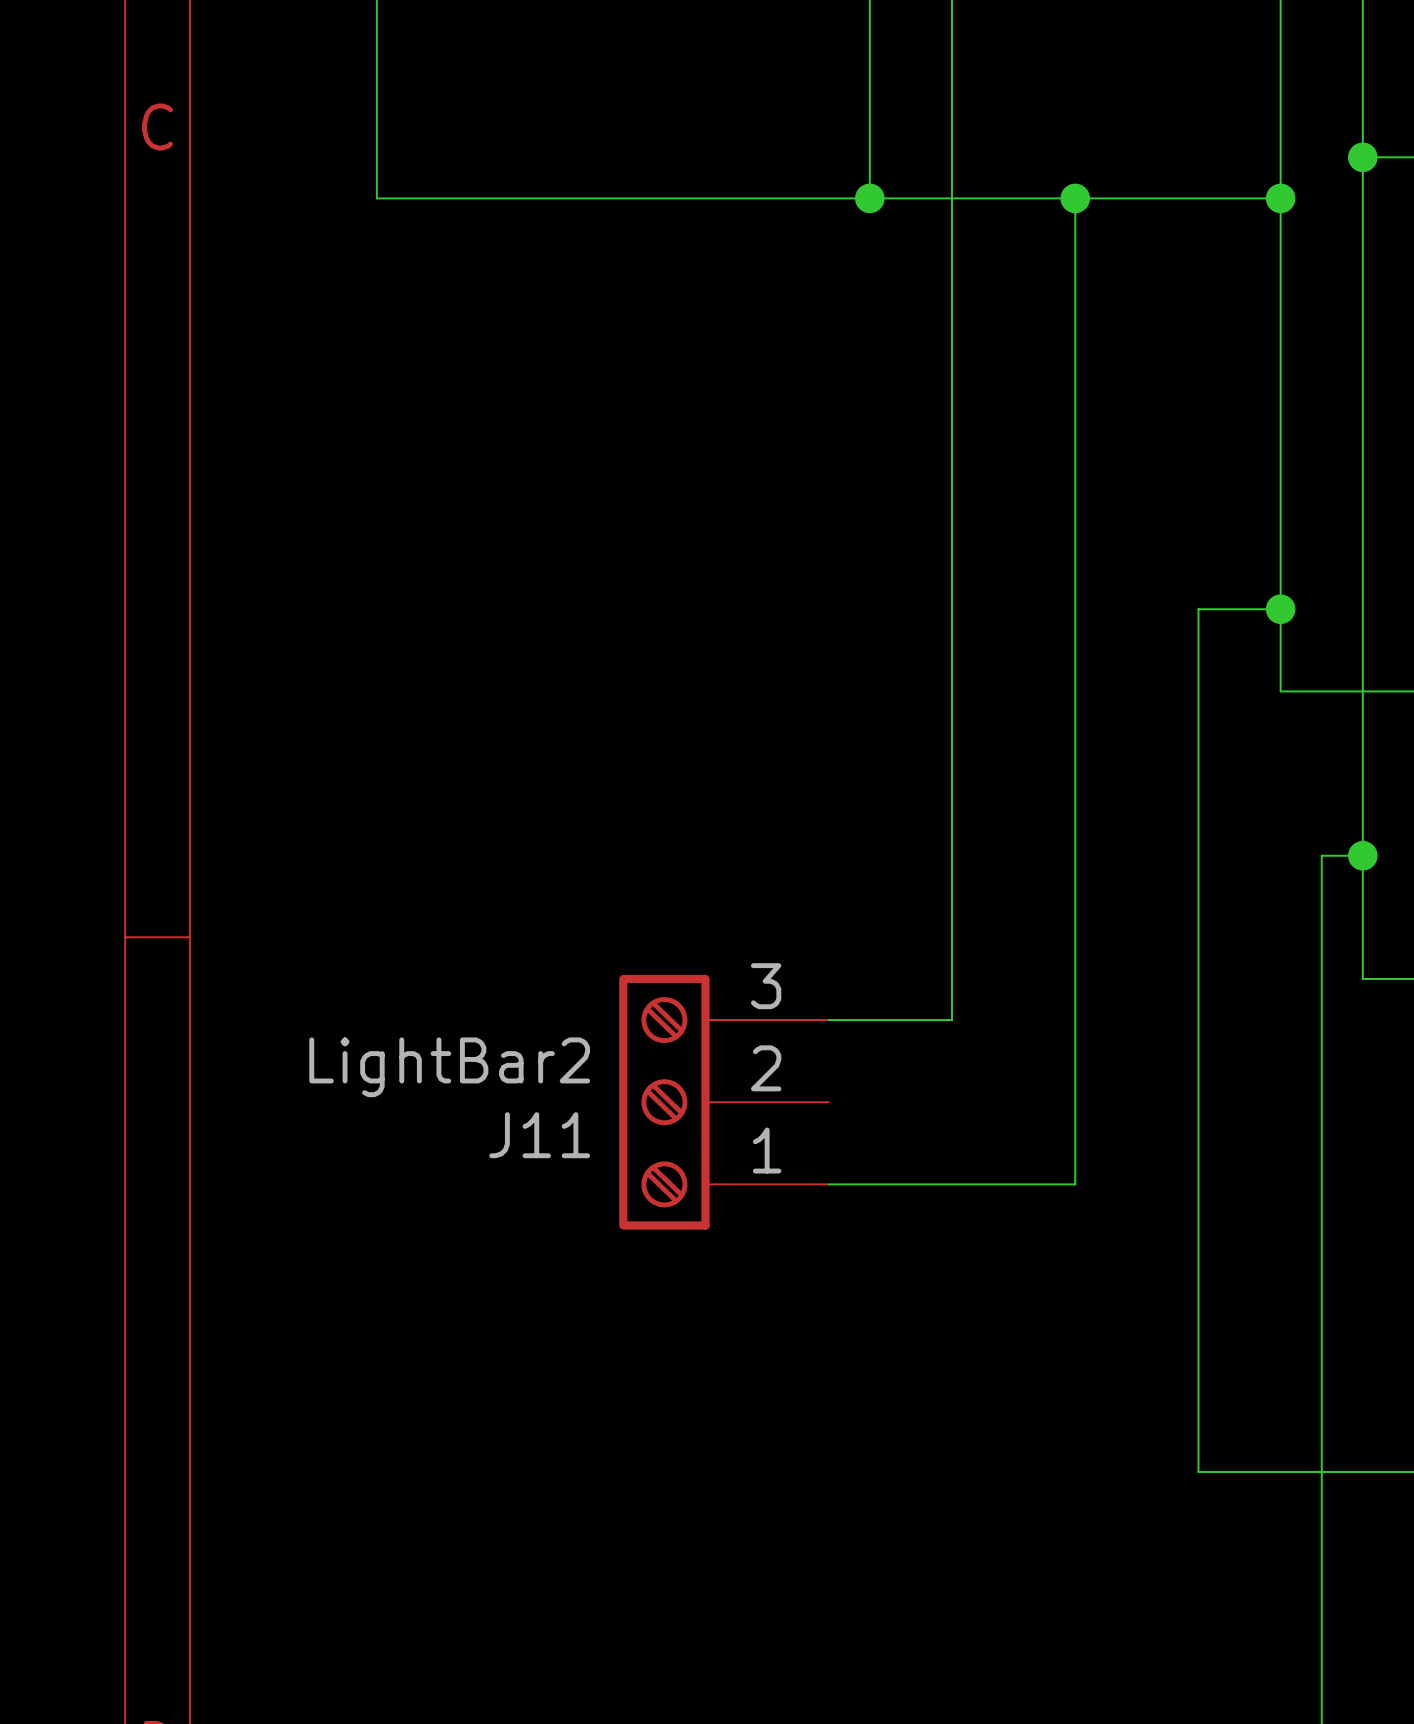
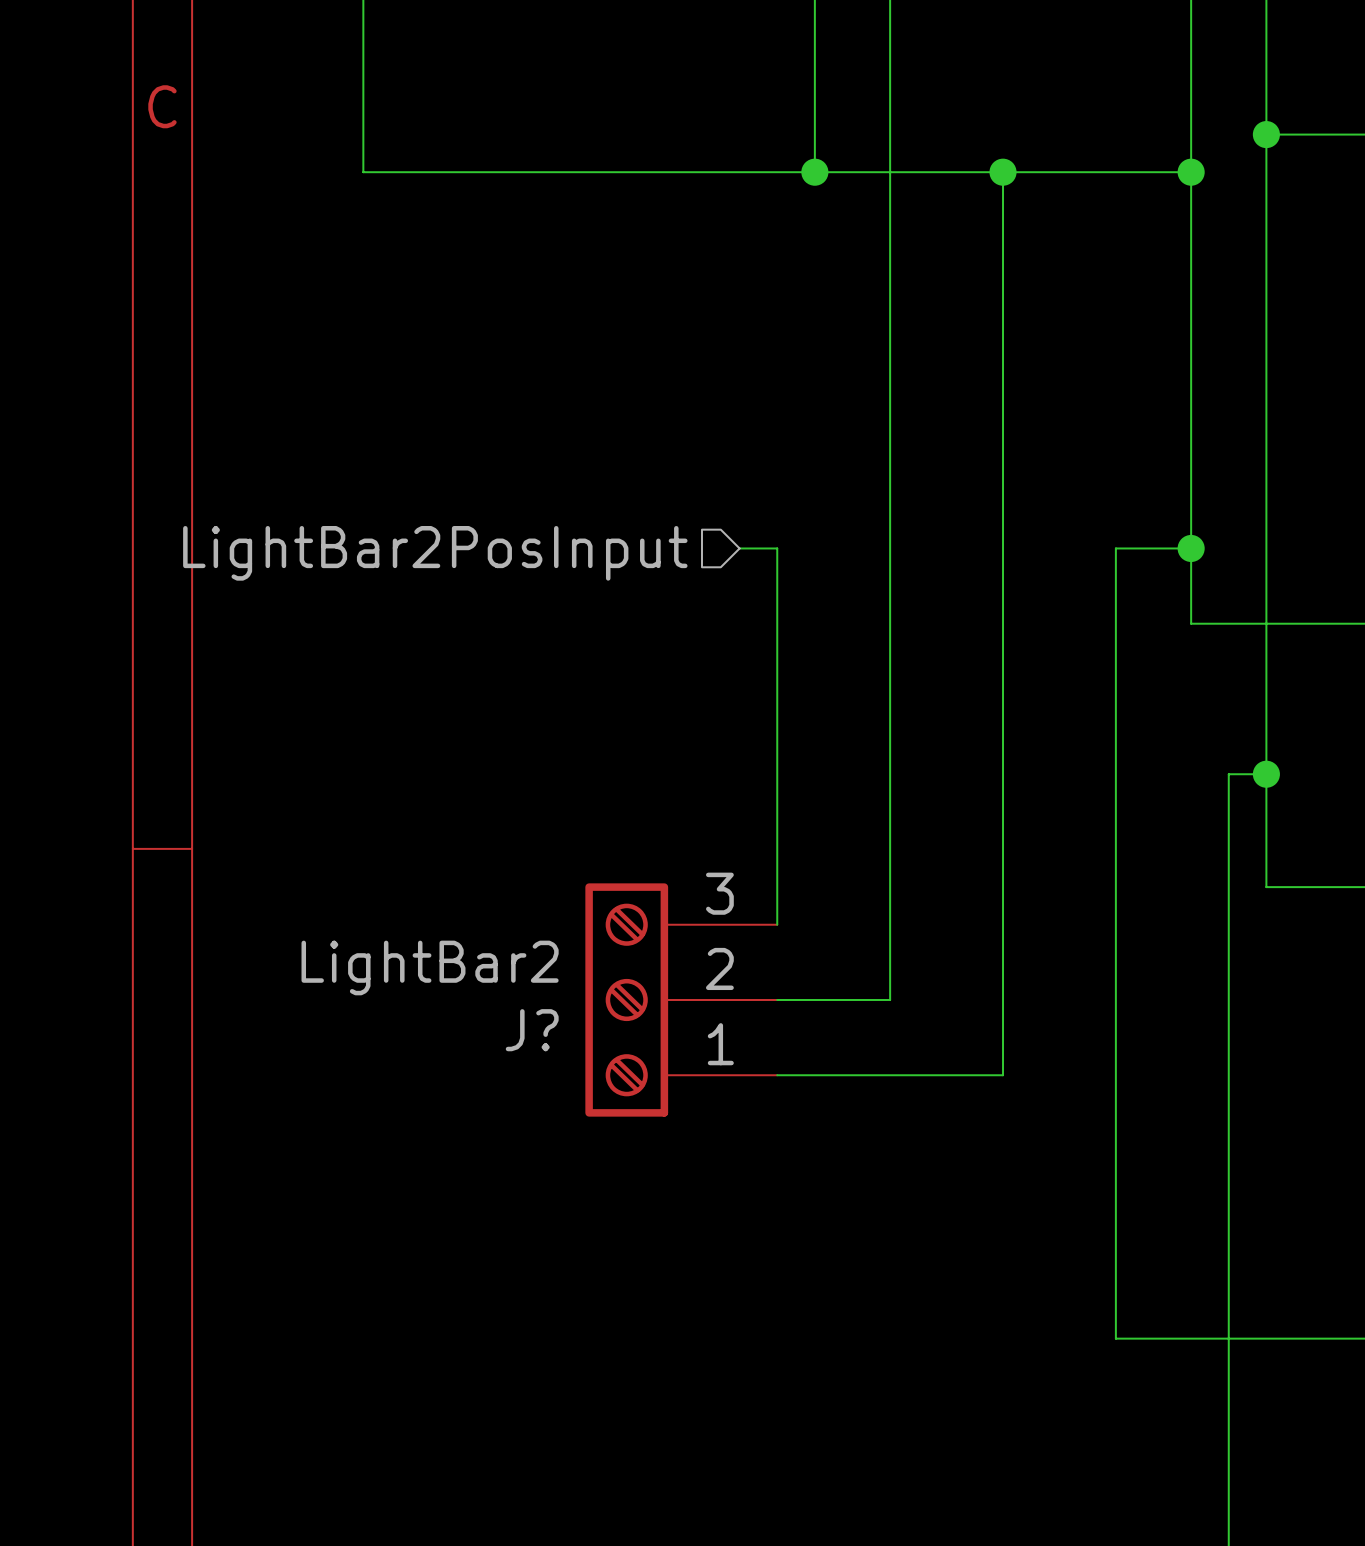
wire: none -> (739, 548) (777, 548) (777, 924)
hierarchical label: none -> LightBar2PosInput (435, 553)
wire: (828, 1020) (952, 1020) -> (777, 999) (890, 999) (890, 924)
J11 name: J11 (539, 1135) -> J? (532, 1030)

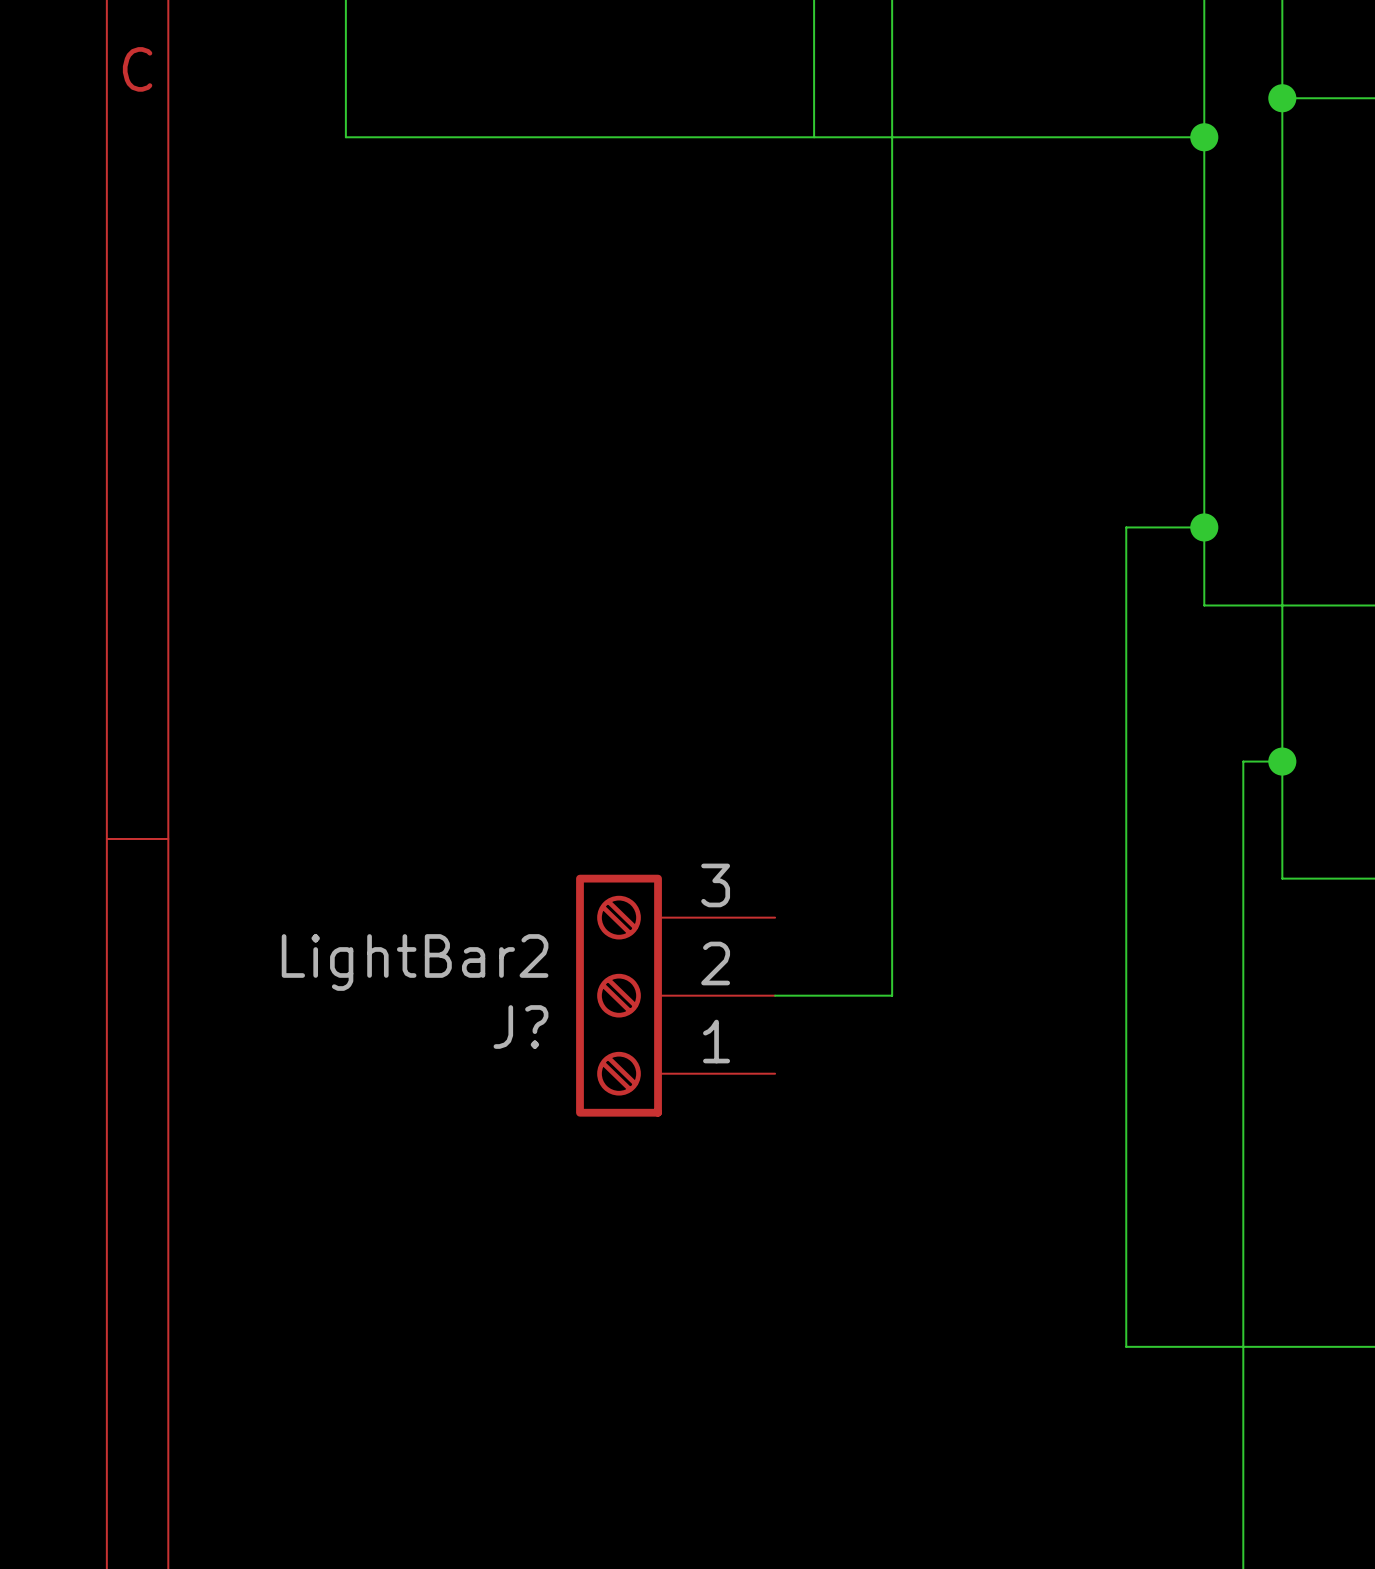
junction: (814, 172) -> none
wire: (1003, 172) (1003, 1075) (777, 1075) -> none
junction: (1003, 172) -> none
wire: (739, 548) (777, 548) (777, 924) -> none
hierarchical label: LightBar2PosInput (435, 553) -> none

